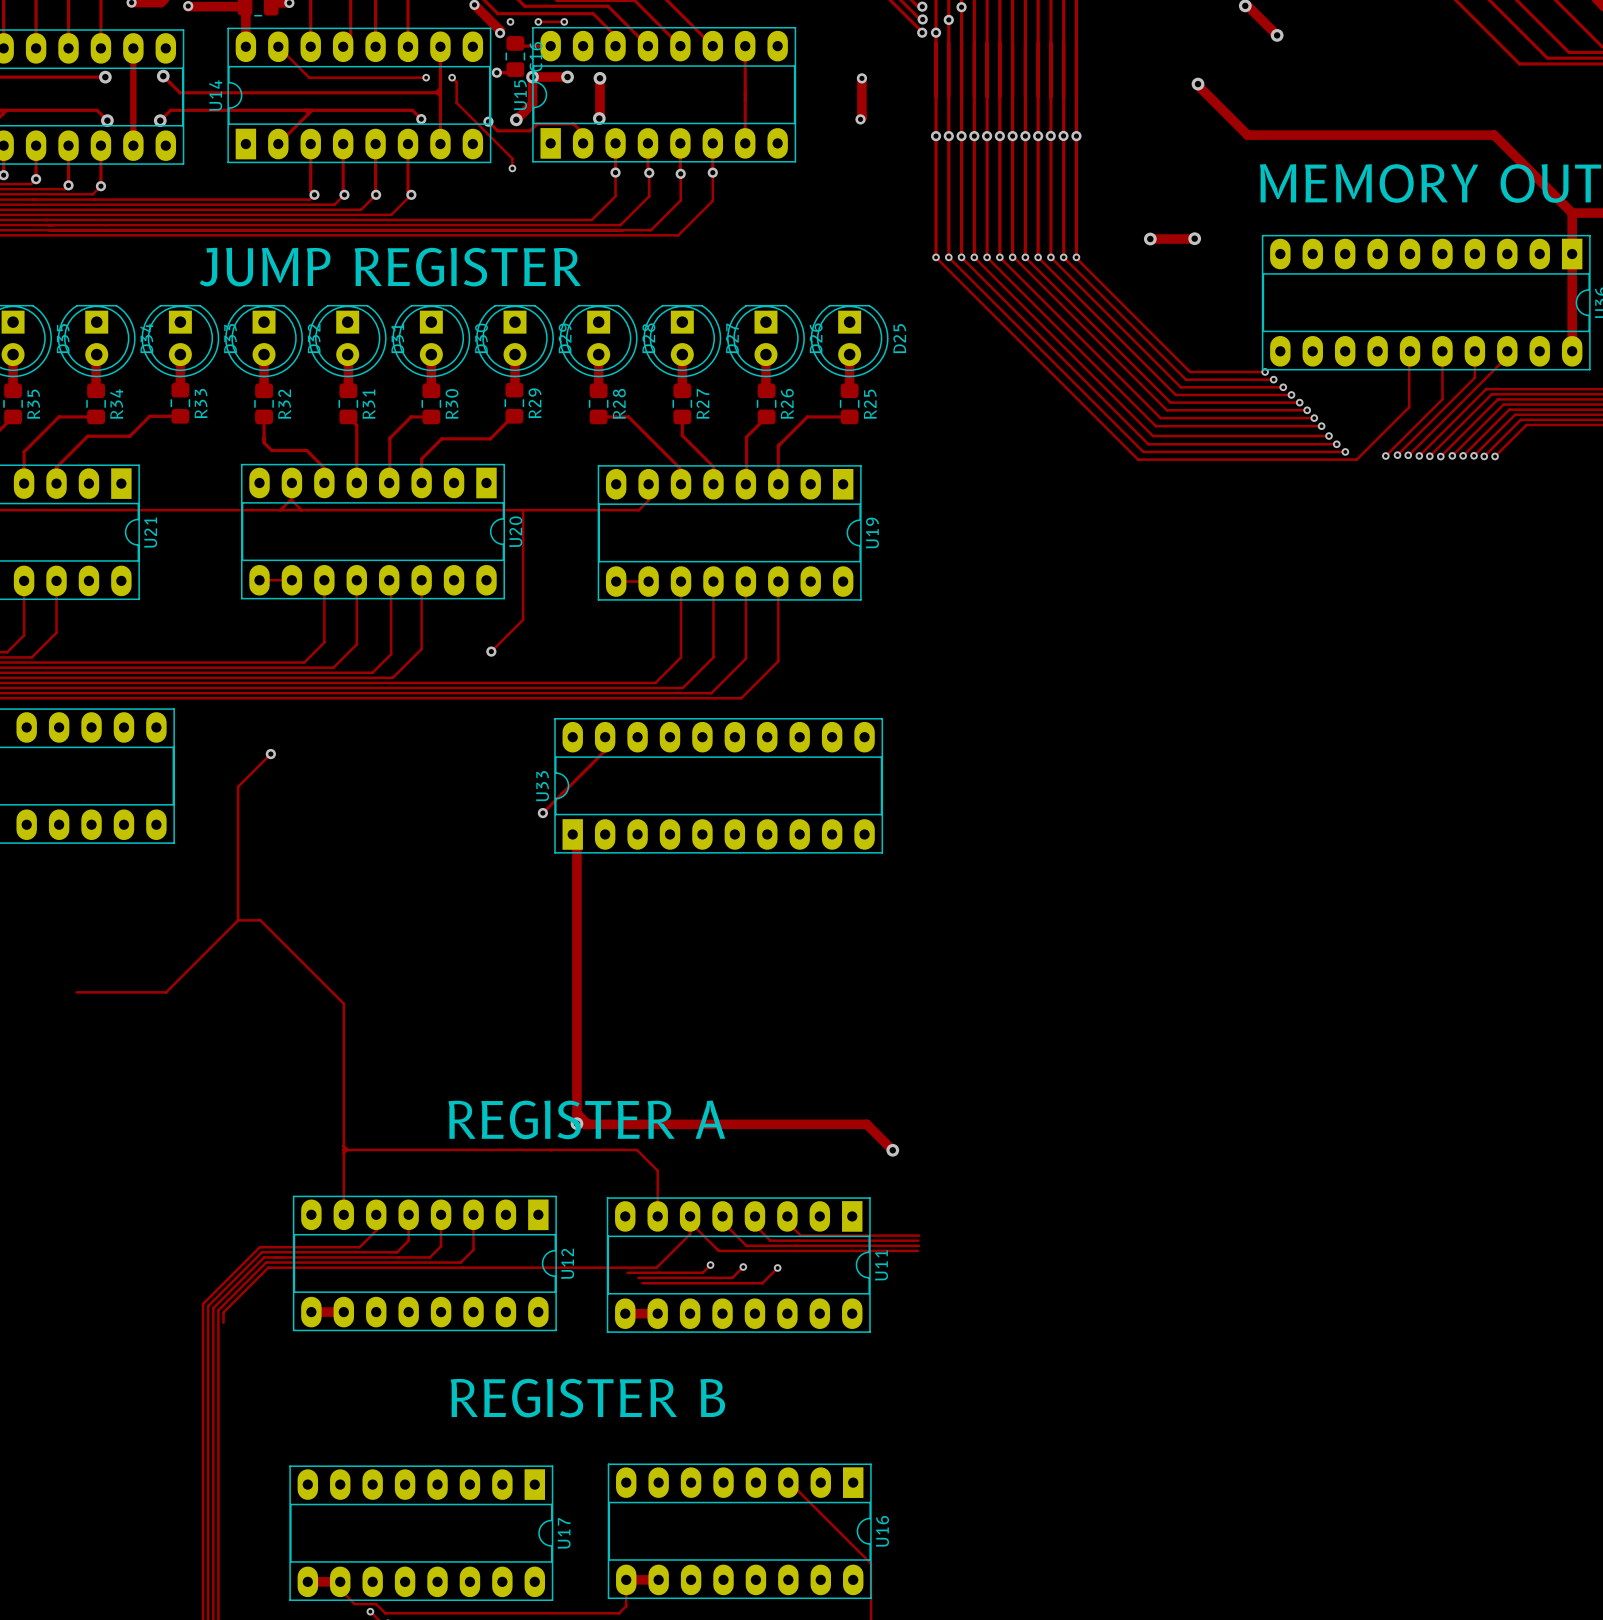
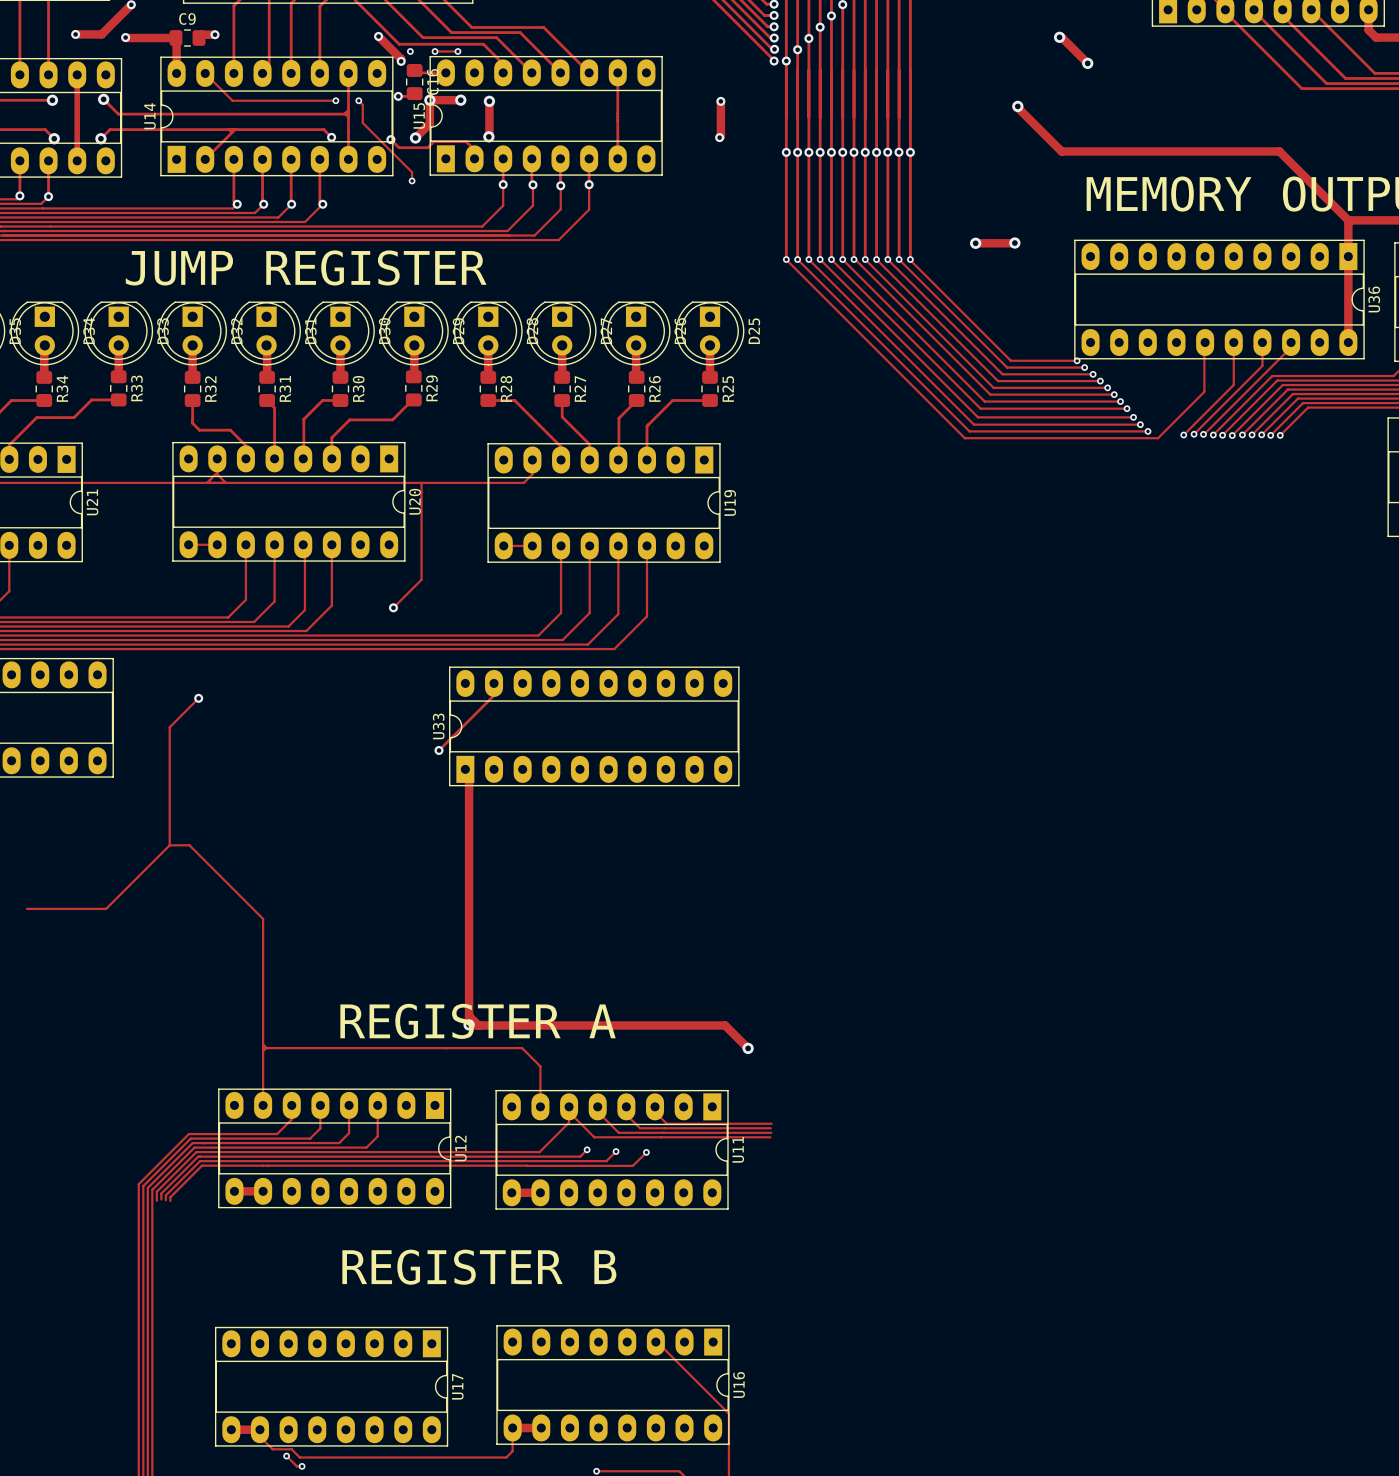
track: none -> (513, 1156) (198, 1156) (161, 1193) (161, 1199)
track: none -> (523, 1161) (200, 1161) (165, 1195) (165, 1200)
track: none -> (526, 1165) (202, 1165) (170, 1197) (170, 1200)

